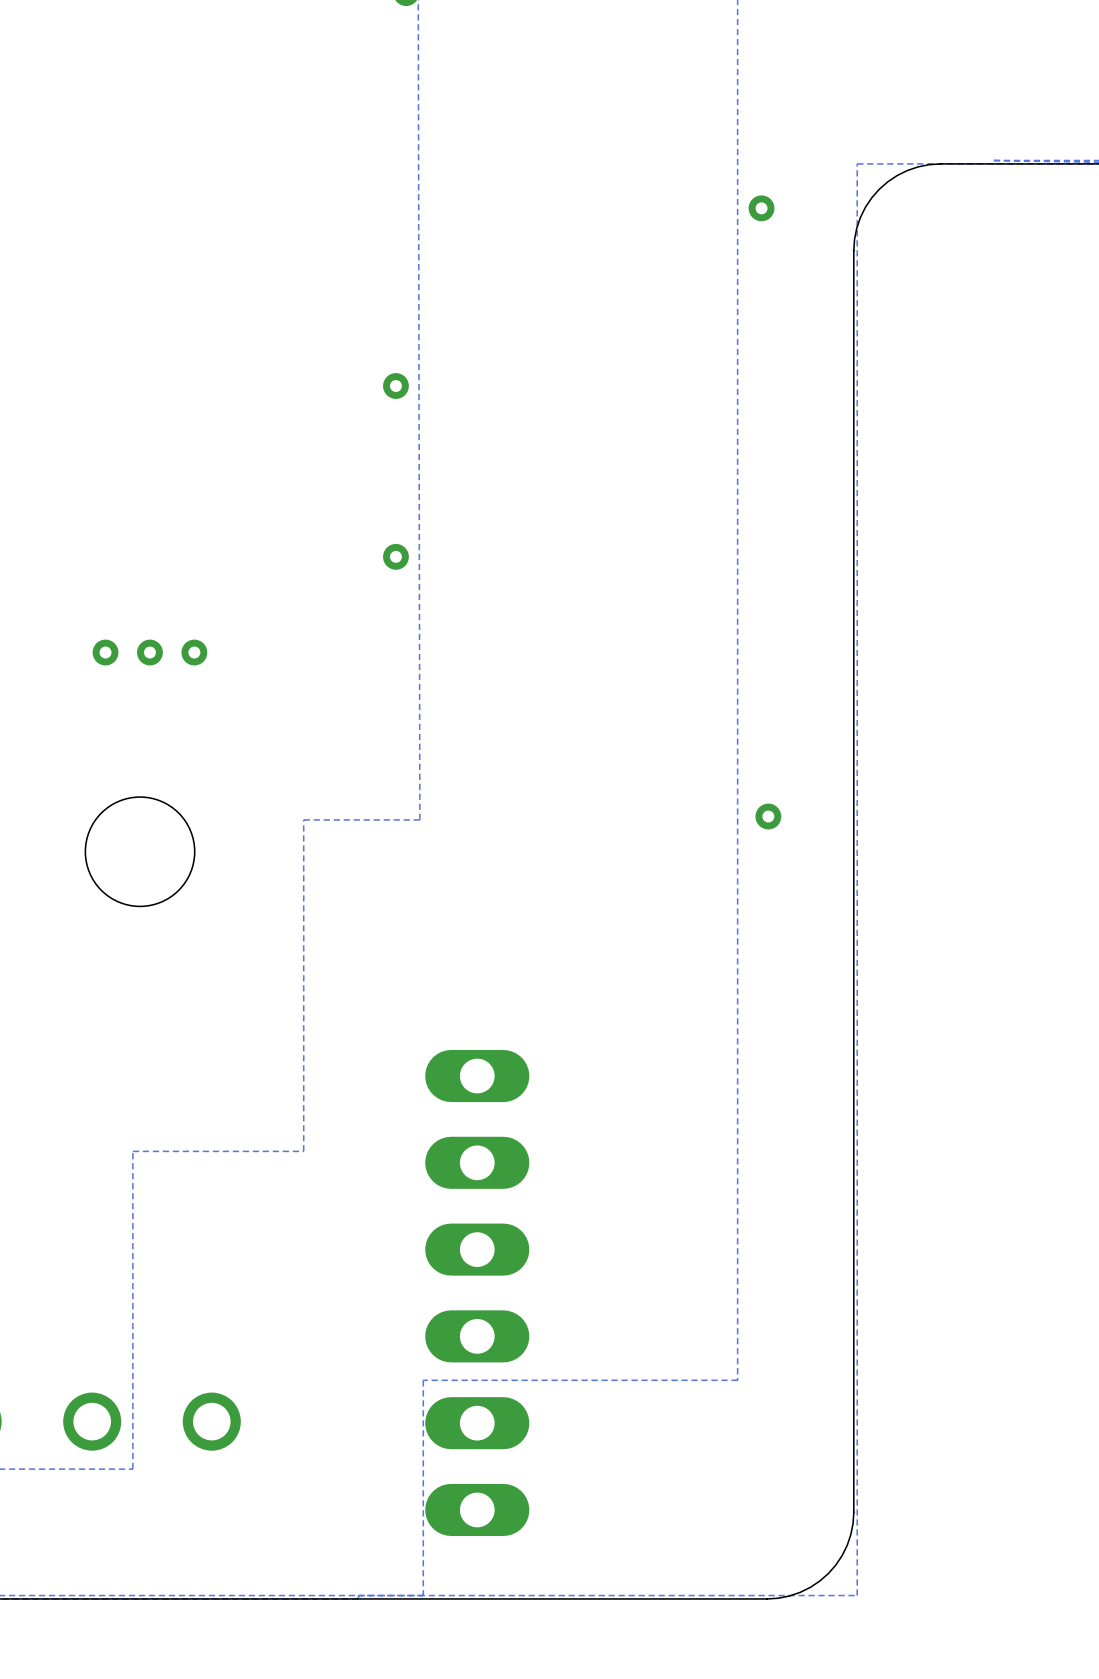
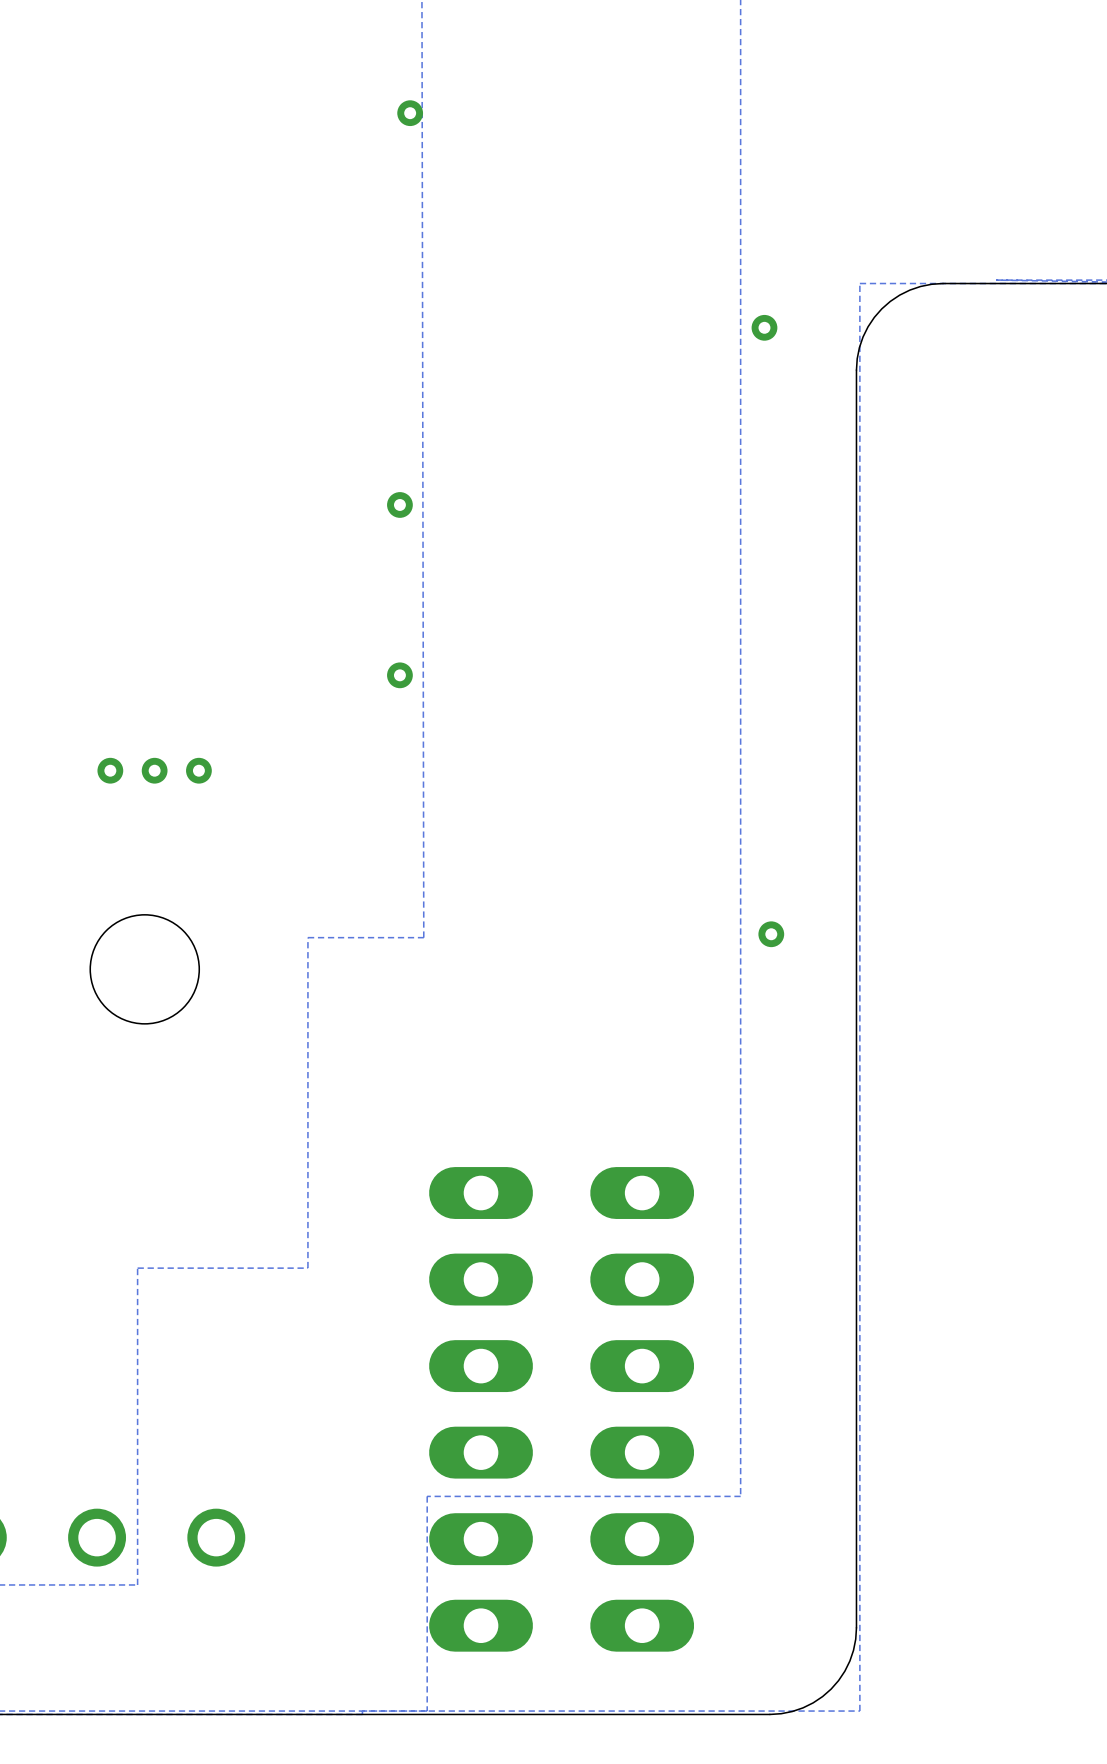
part: none -> (642, 1409)

